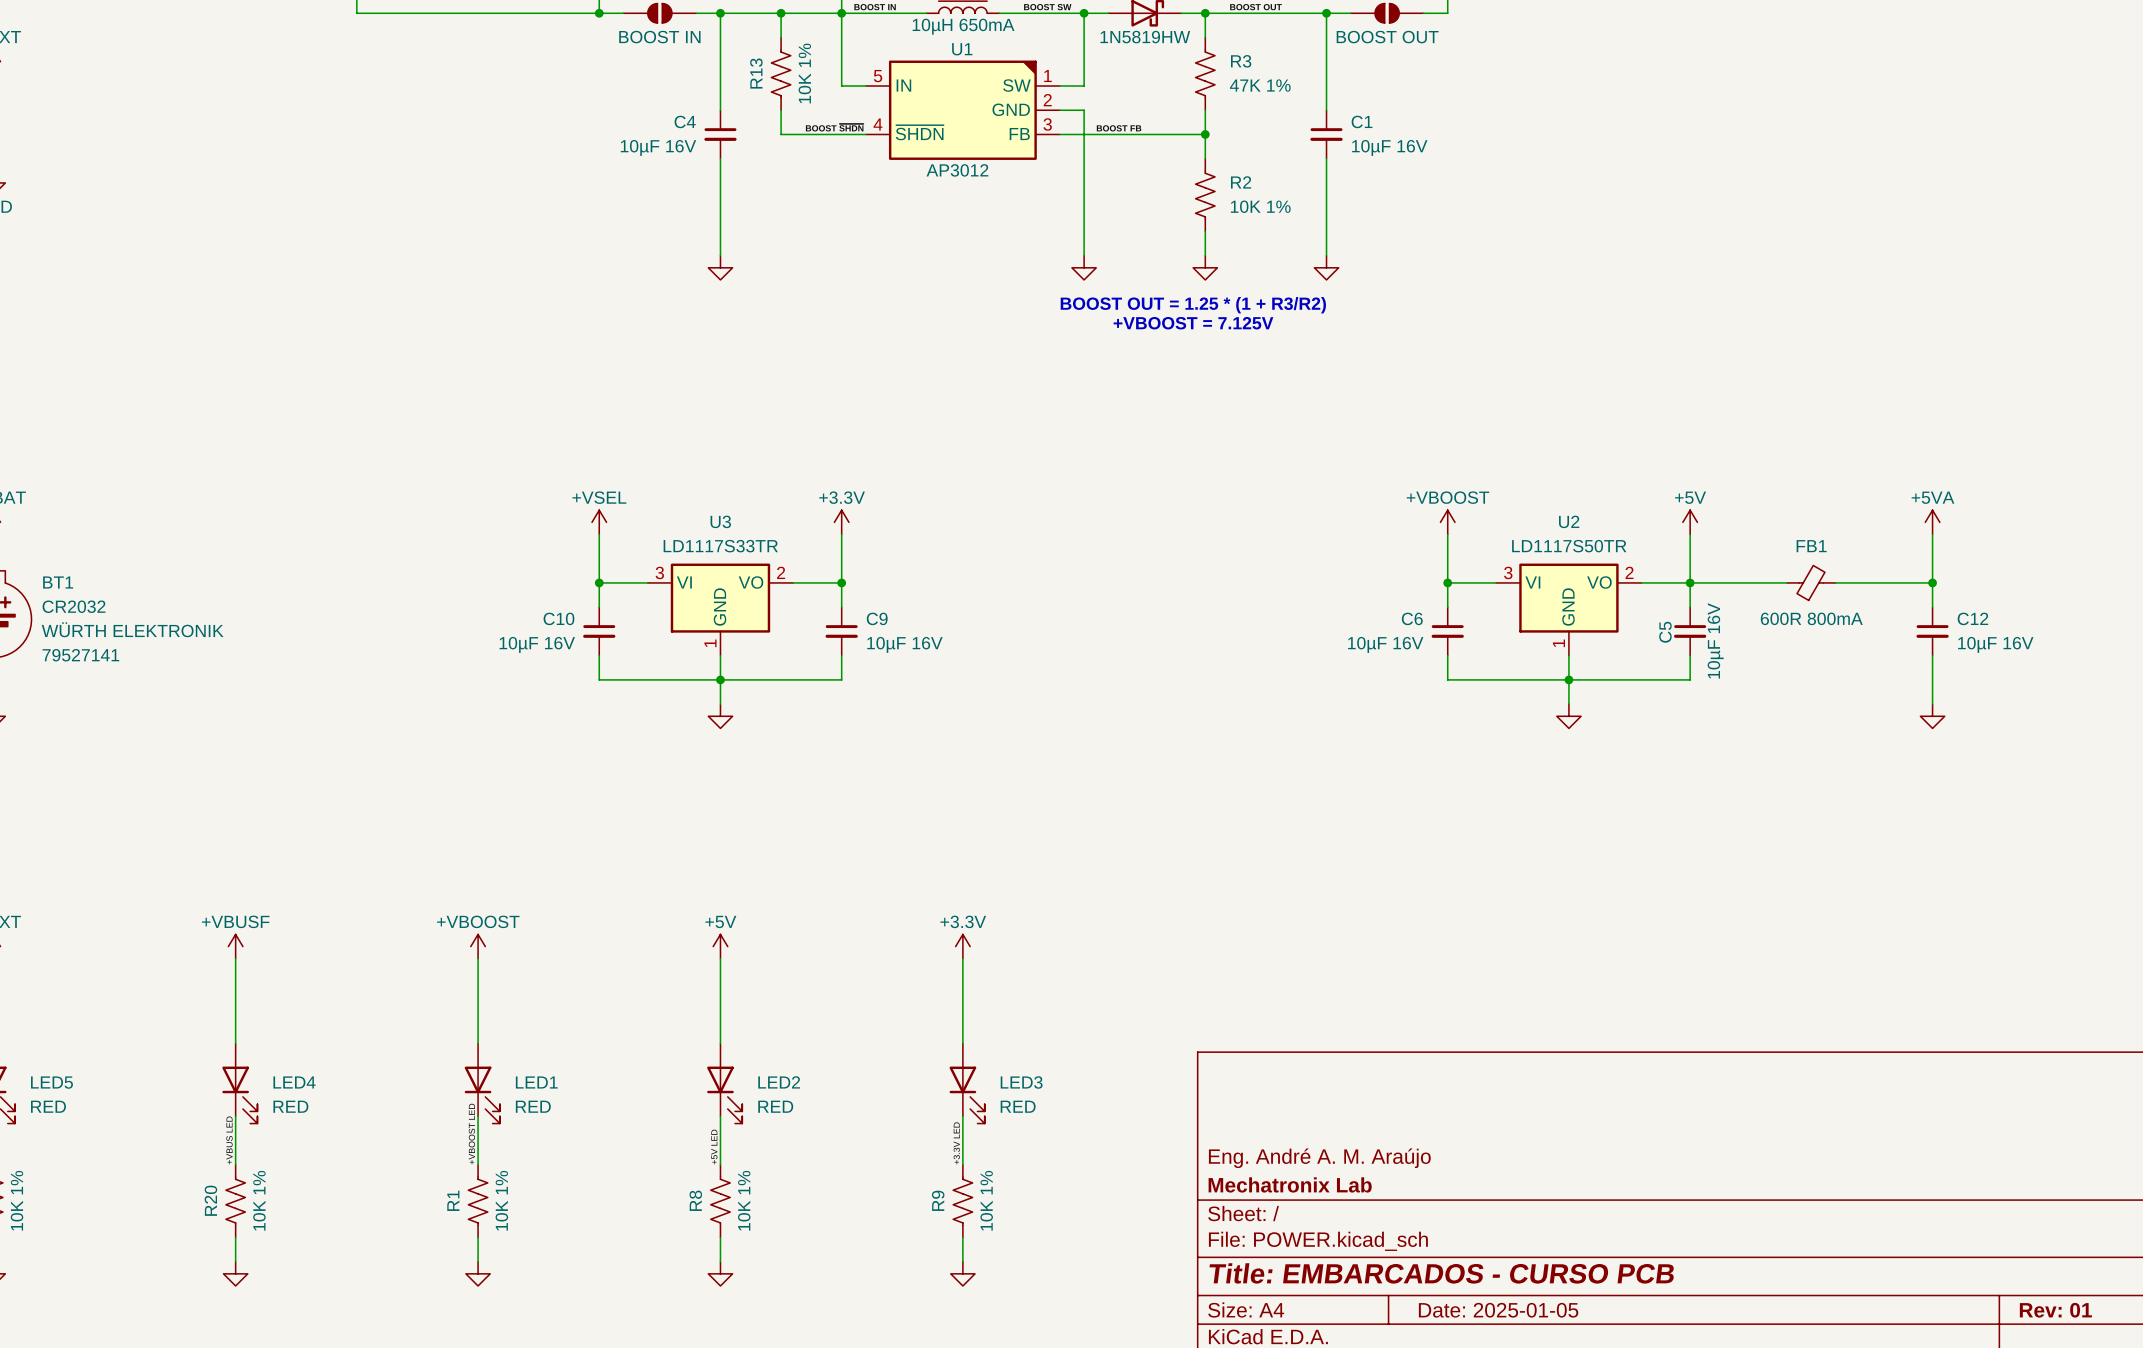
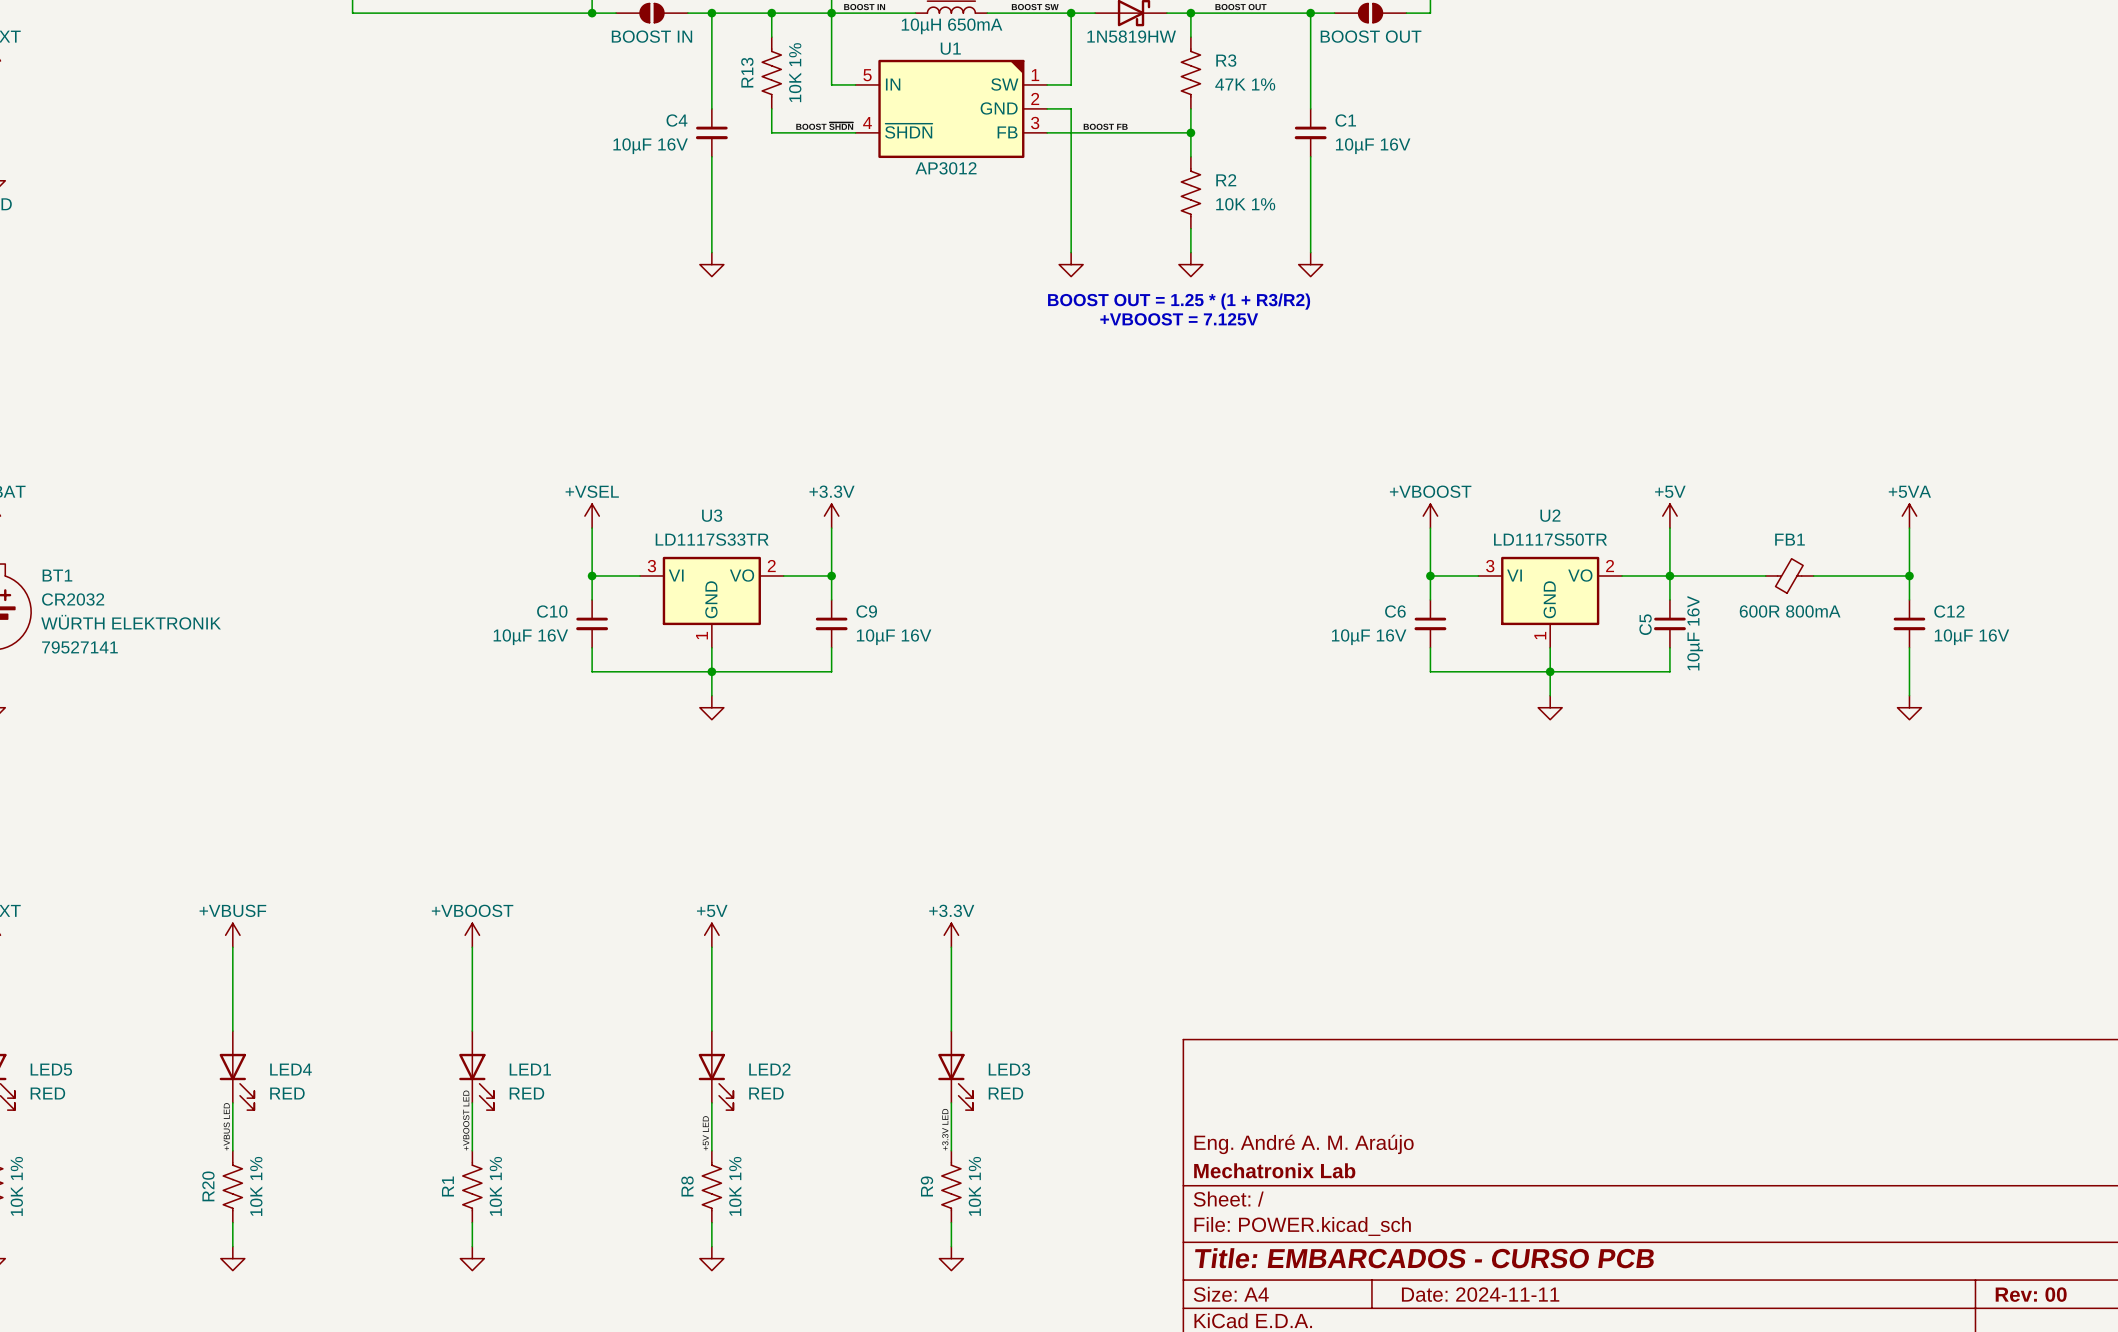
title block: Date: 2025-01-05 (1498, 1310) -> Date: 2024-11-11 (1480, 1294)
title block: Rev: 01 (2055, 1310) -> Rev: 00 (2031, 1294)

